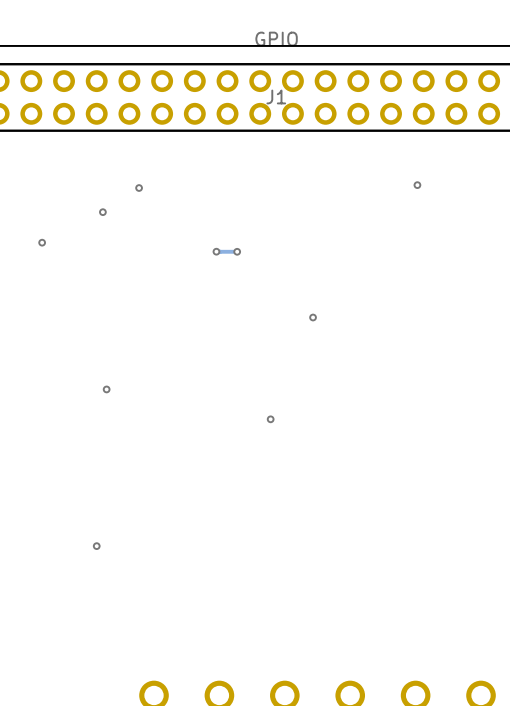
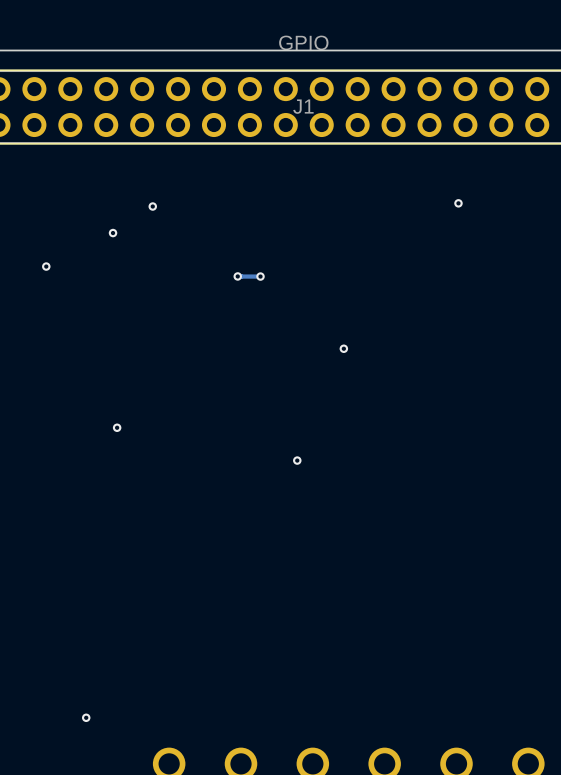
via: (96, 546) -> none
via: none -> (86, 717)

